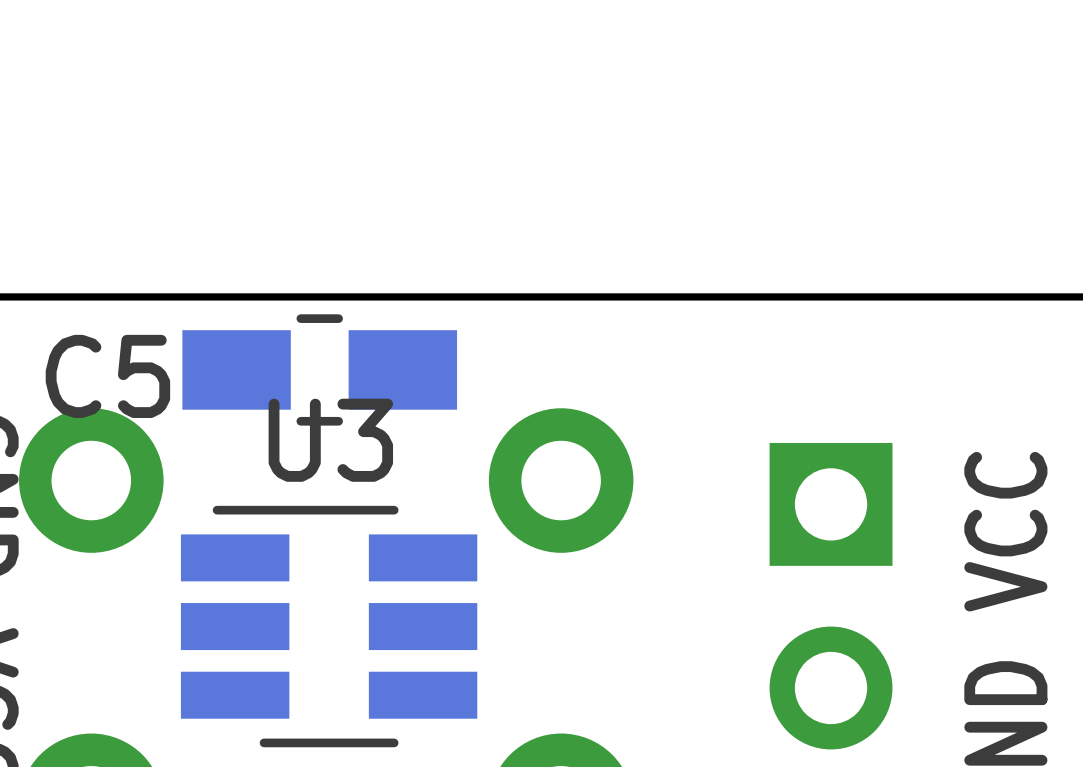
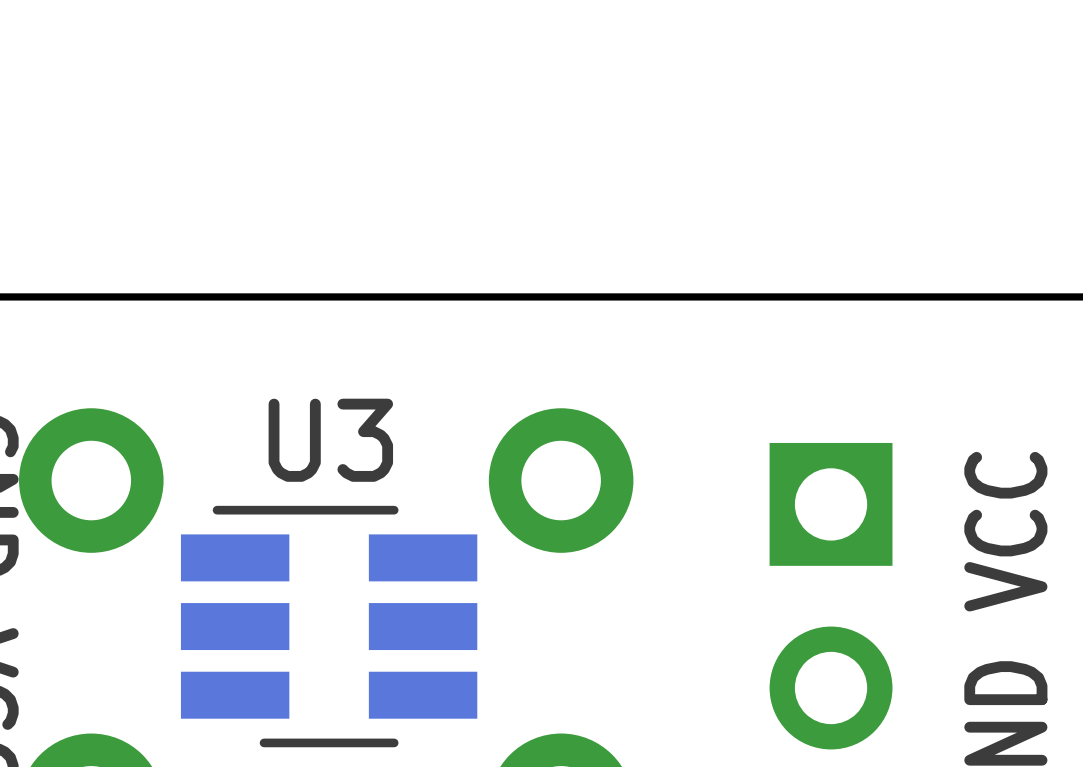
C5: (319, 369) -> none

